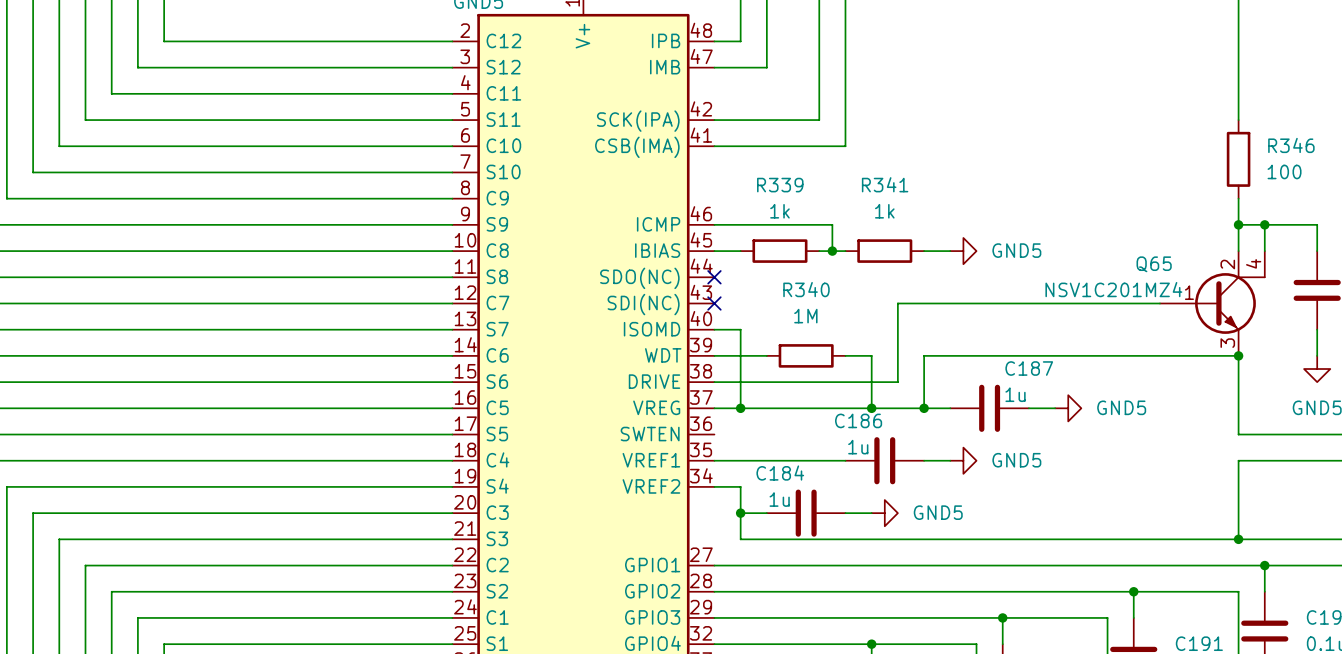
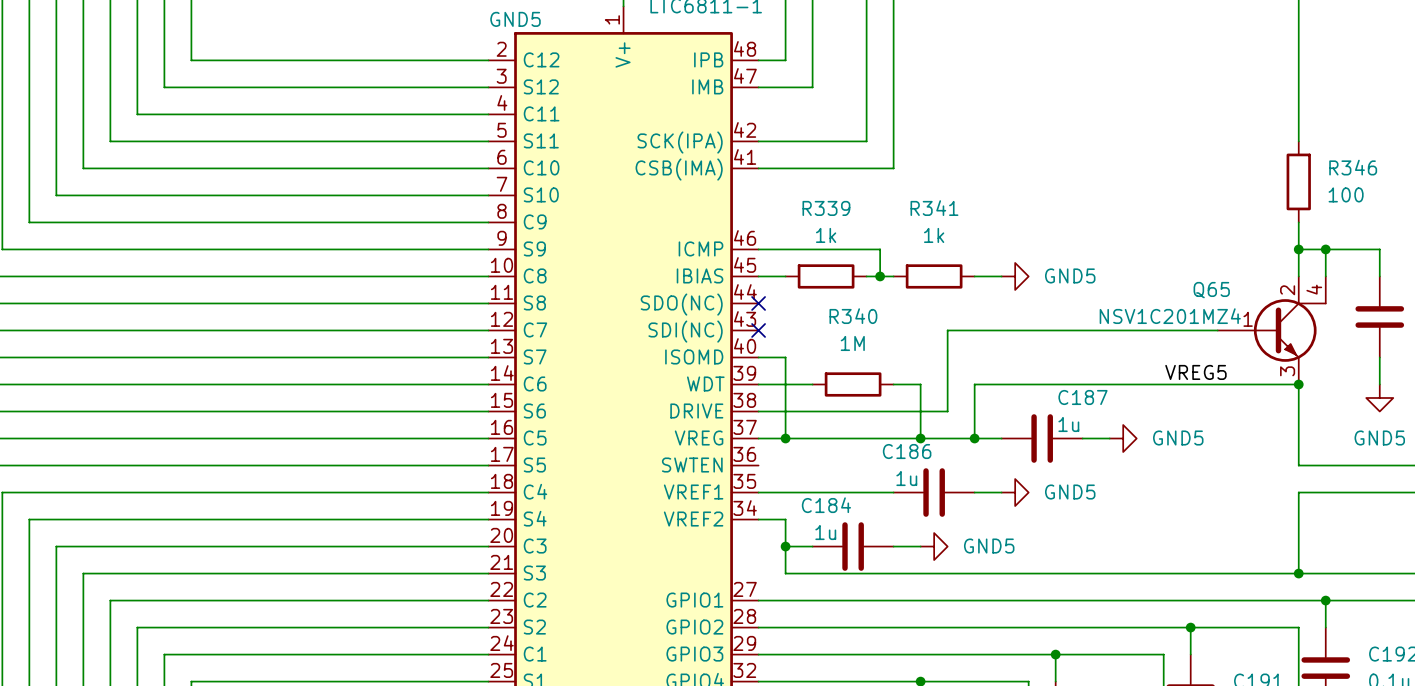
label: none -> VREG5 (1195, 372)

